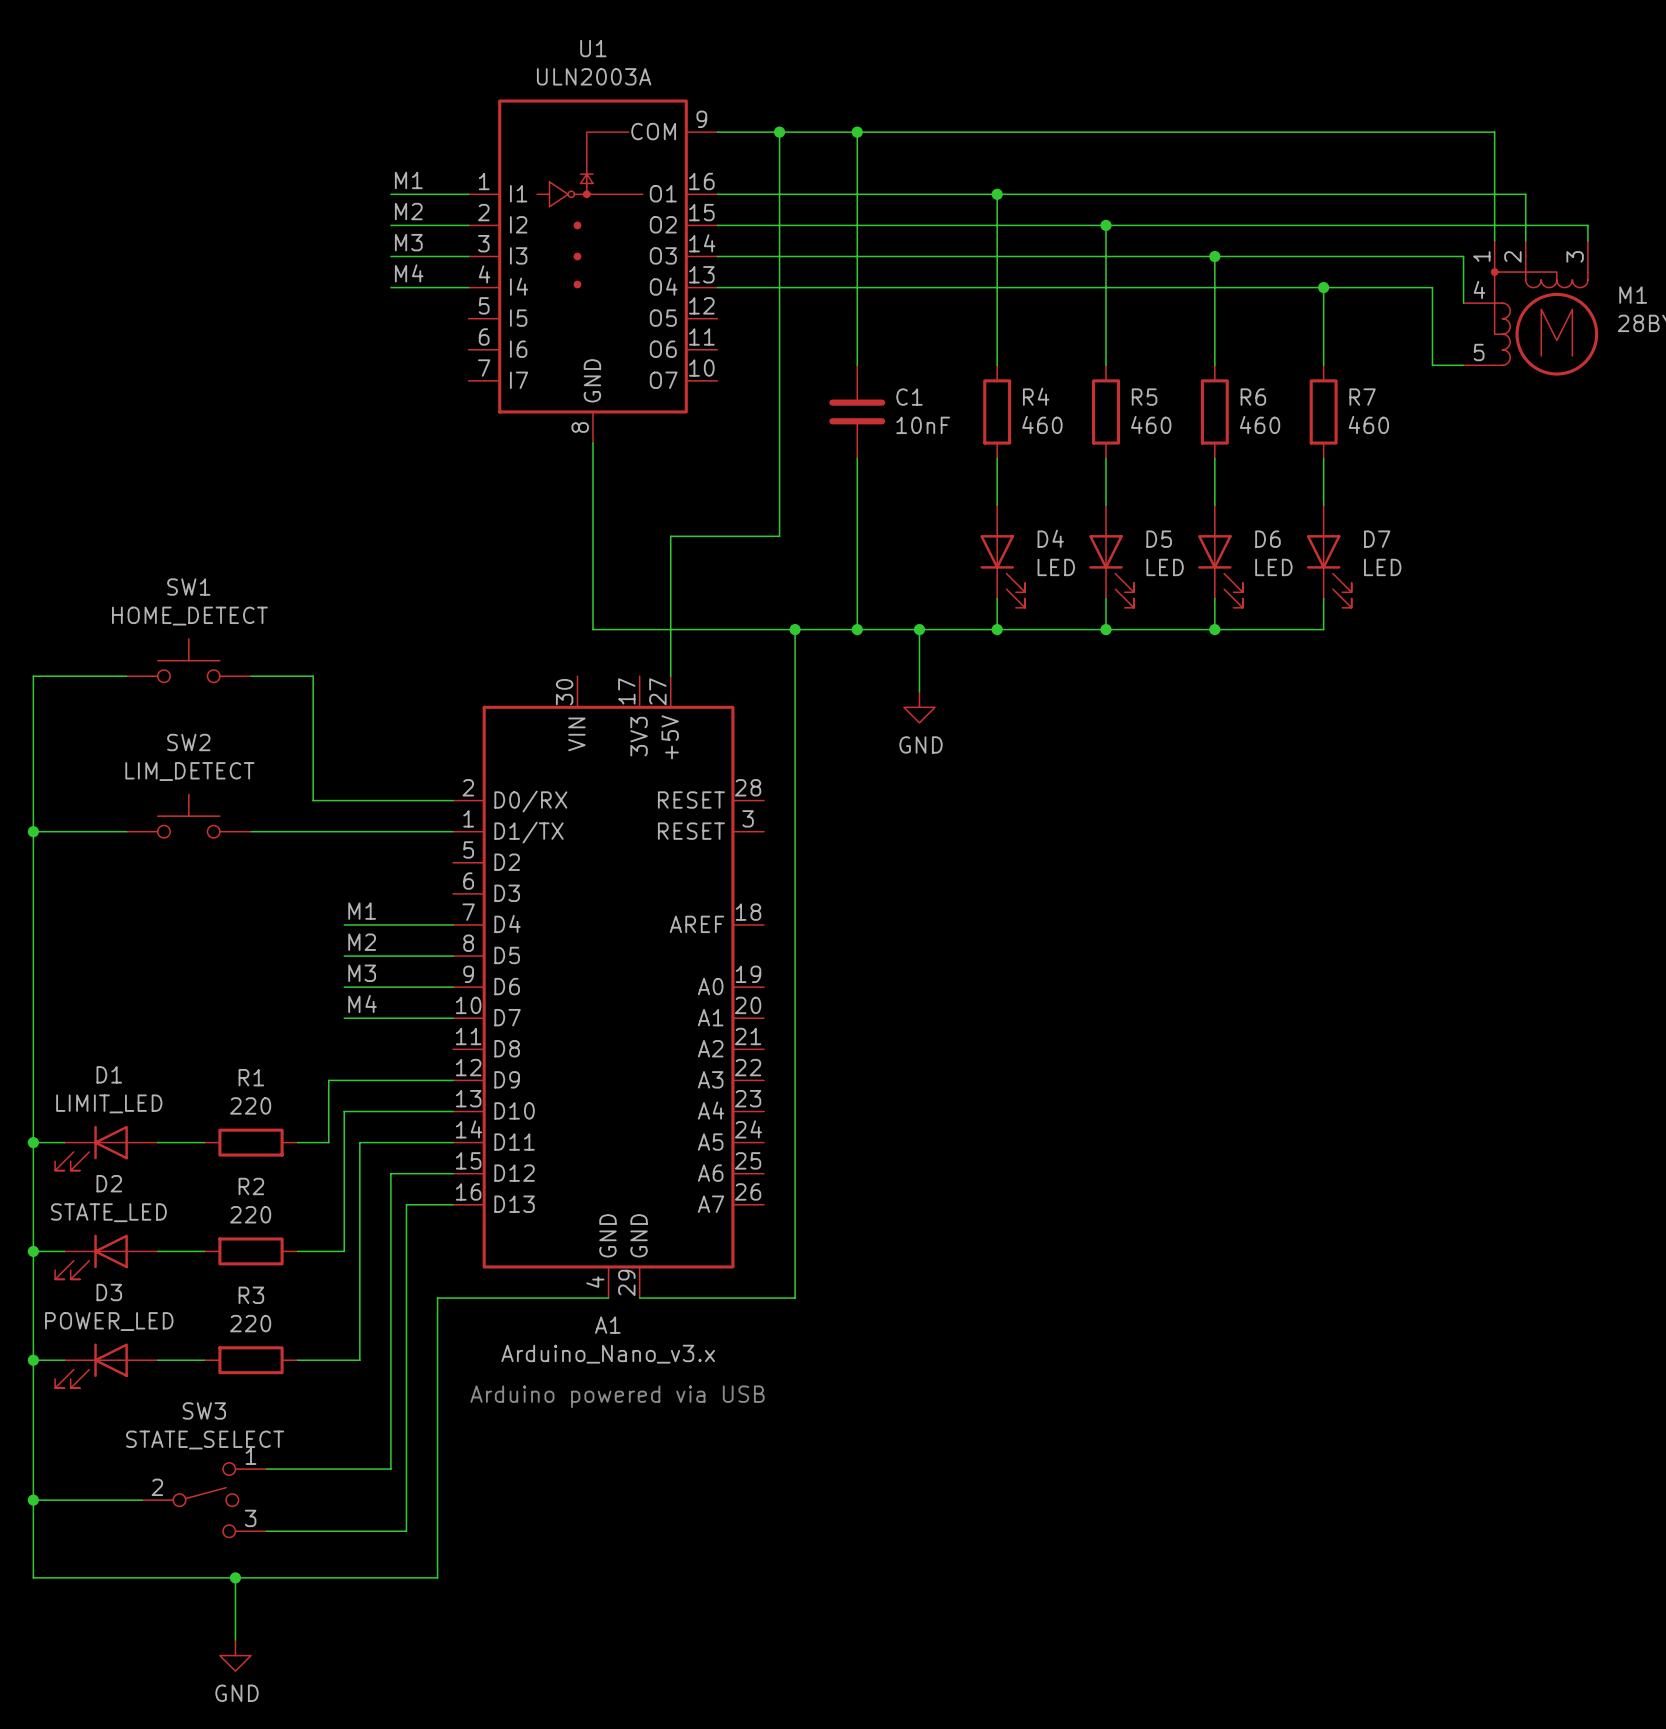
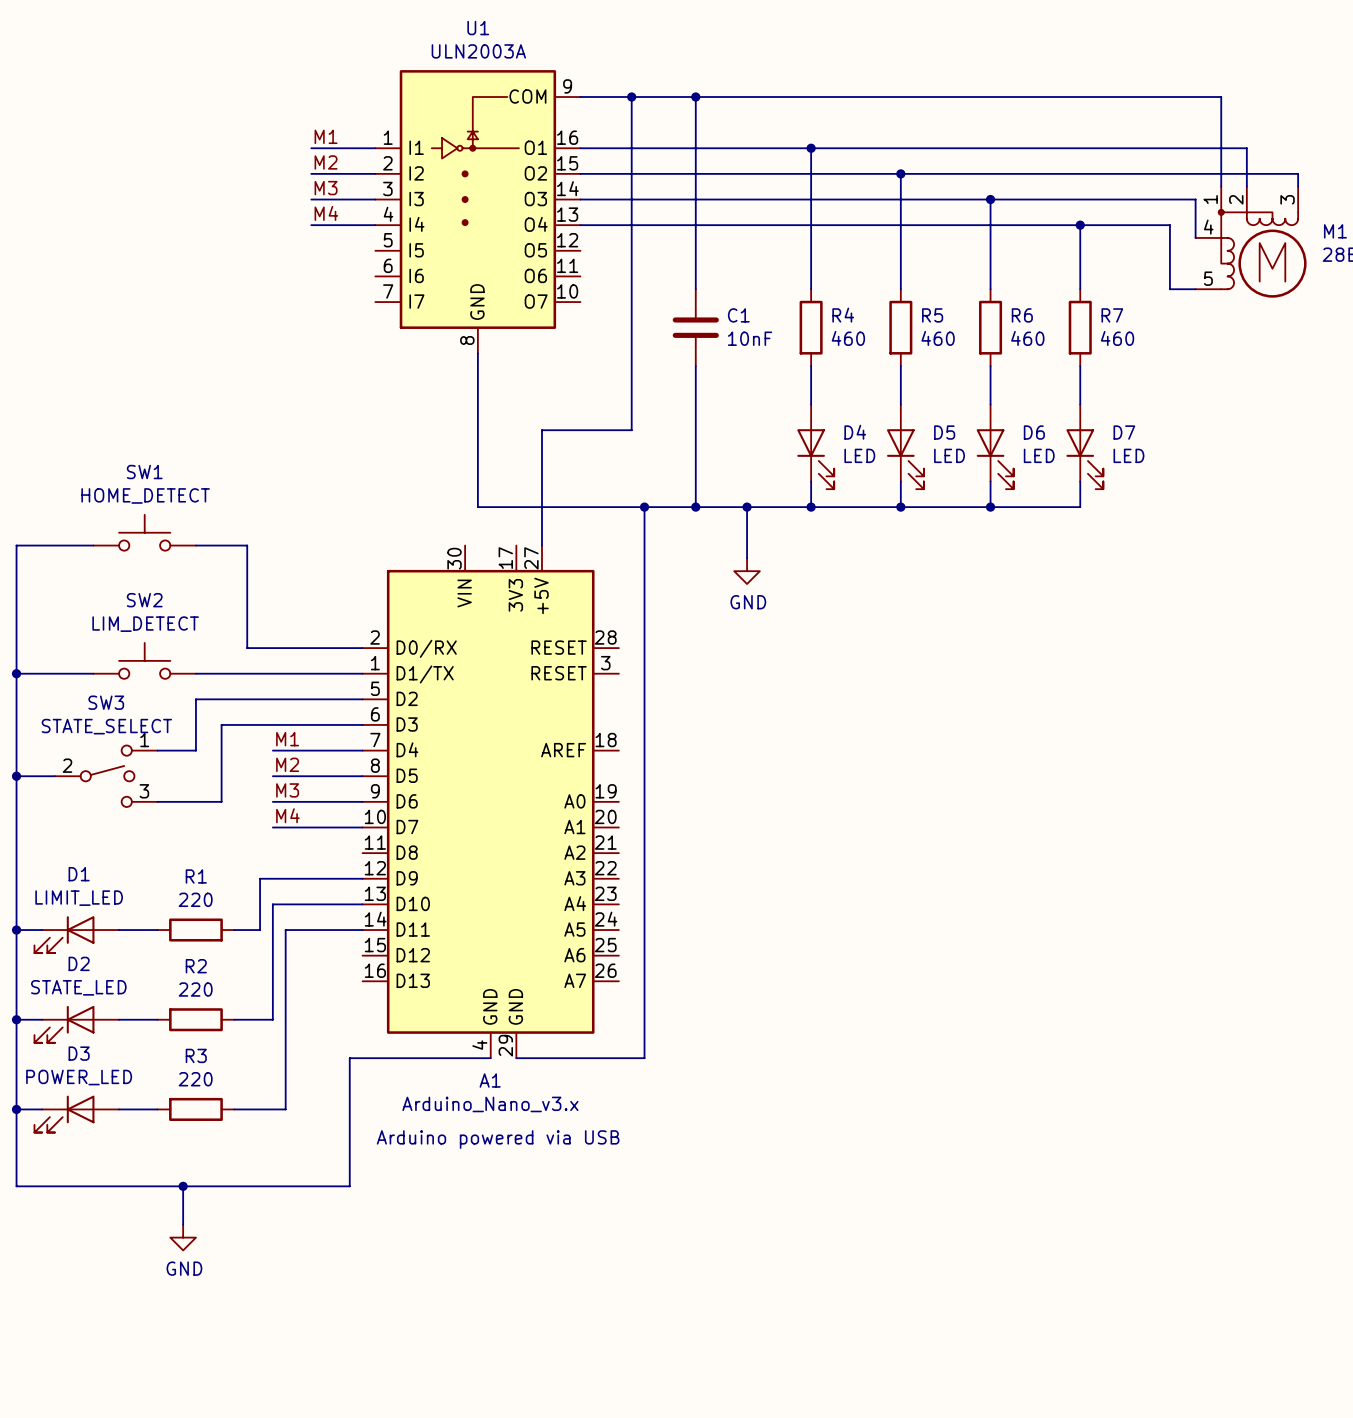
wire: none -> (362, 699) (195, 699) (195, 750) (157, 750)
wire: none -> (362, 724) (221, 724) (221, 801) (157, 801)
wire: none -> (16, 776) (54, 776)
junction: none -> (16, 776)
wire: (453, 1173) (390, 1173) (390, 1469) (266, 1469) -> none
wire: (453, 1204) (406, 1204) (406, 1531) (266, 1531) -> none
wire: (33, 1453) (33, 1577) (437, 1577) (437, 1453) -> (16, 1186) (349, 1186)
wire: none -> (183, 1186) (183, 1224)
junction: none -> (183, 1186)
wire: (33, 1500) (142, 1500) -> none
junction: (33, 1500) -> none
SW3 position: (204, 1500) -> (106, 776)
wire: (235, 1577) (235, 1640) -> none
junction: (235, 1577) -> none
power symbol position: GND (235, 1655) -> GND (183, 1237)

